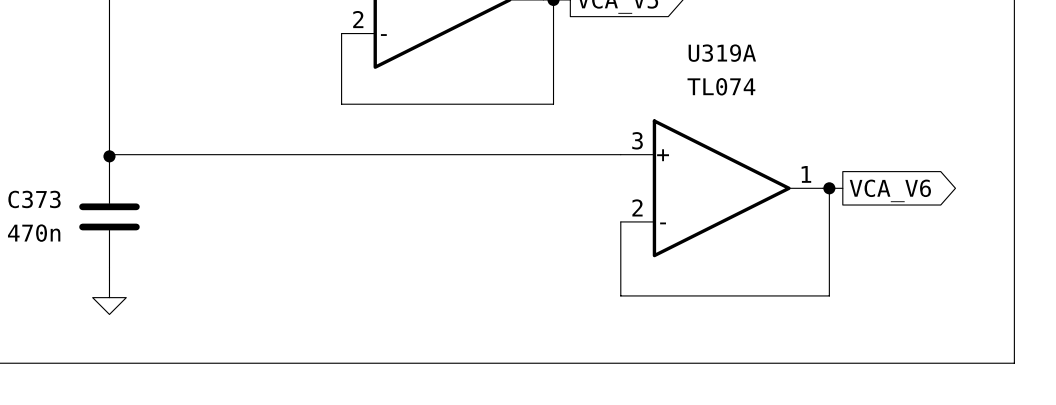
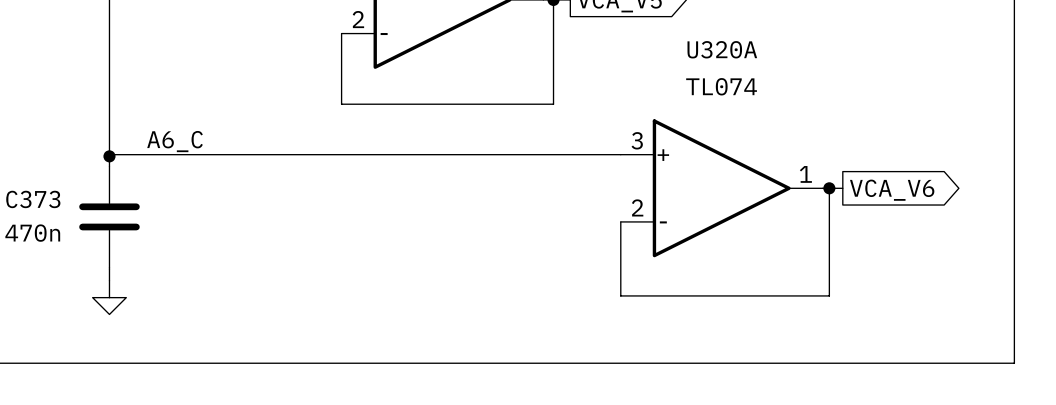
U319A name: U319A (722, 53) -> U320A (722, 49)
label: none -> A6_C (175, 141)

